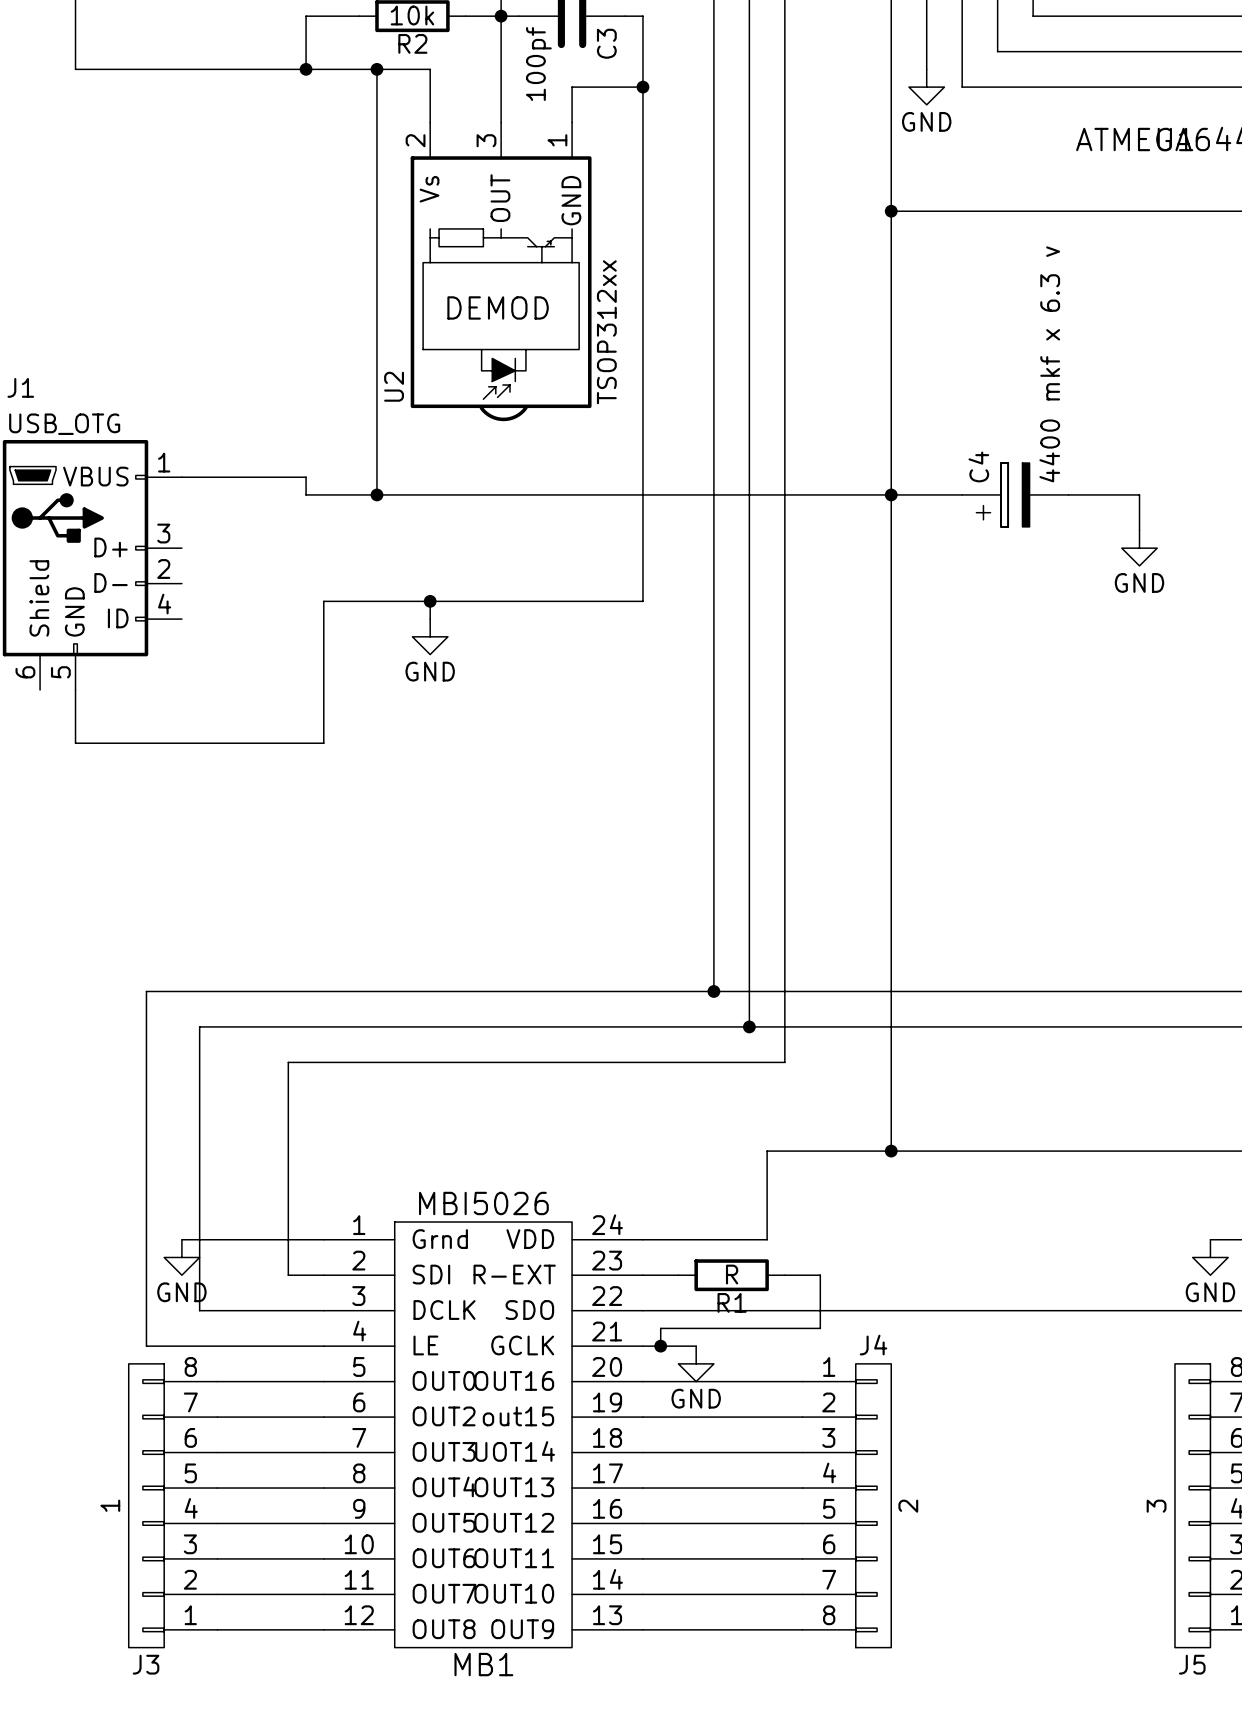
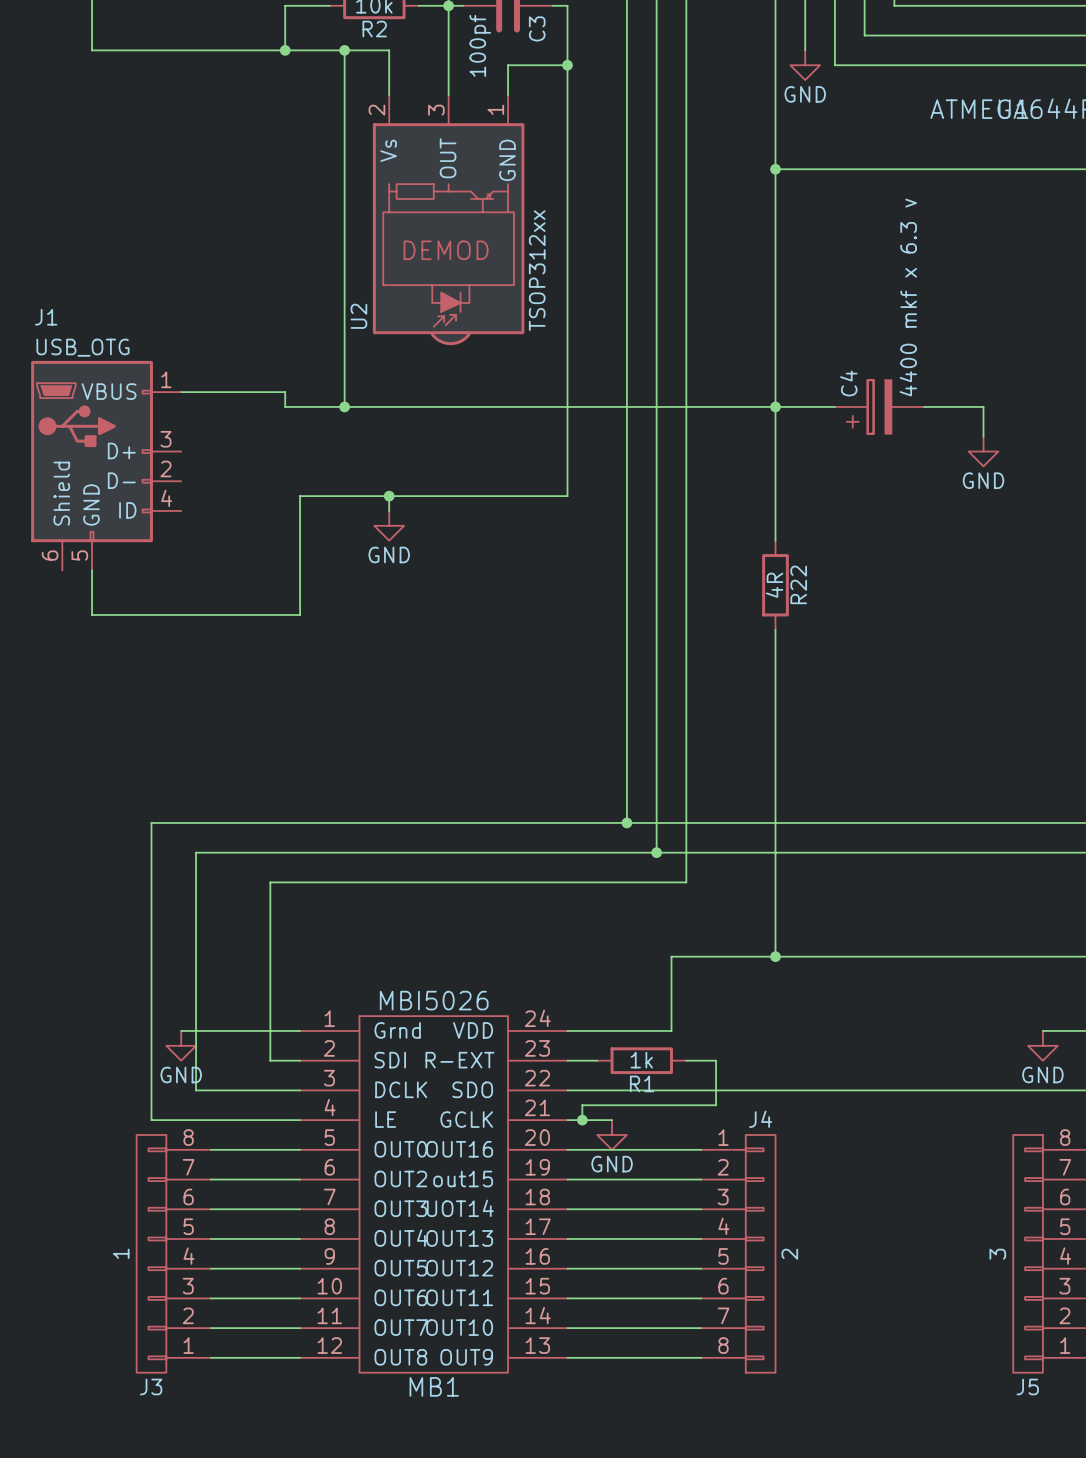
wire: (891, 654) (891, 760) -> none
R22: none -> 4R (775, 585)
R1 value: R (732, 1274) -> 1k (641, 1060)

